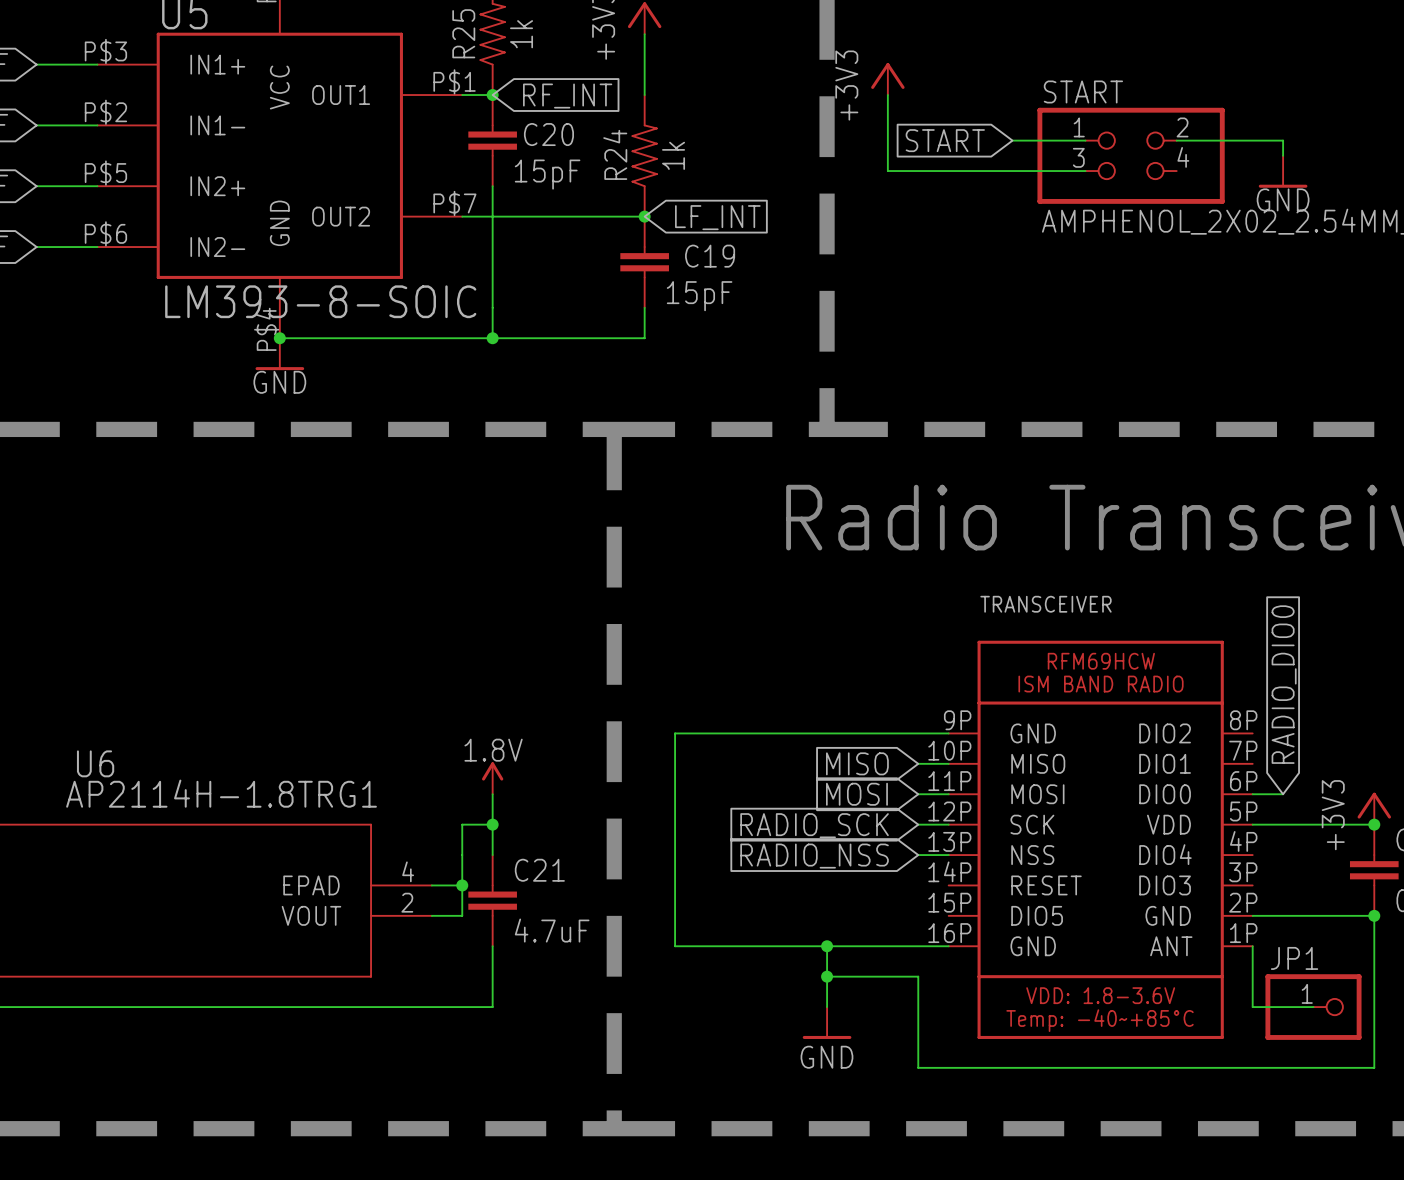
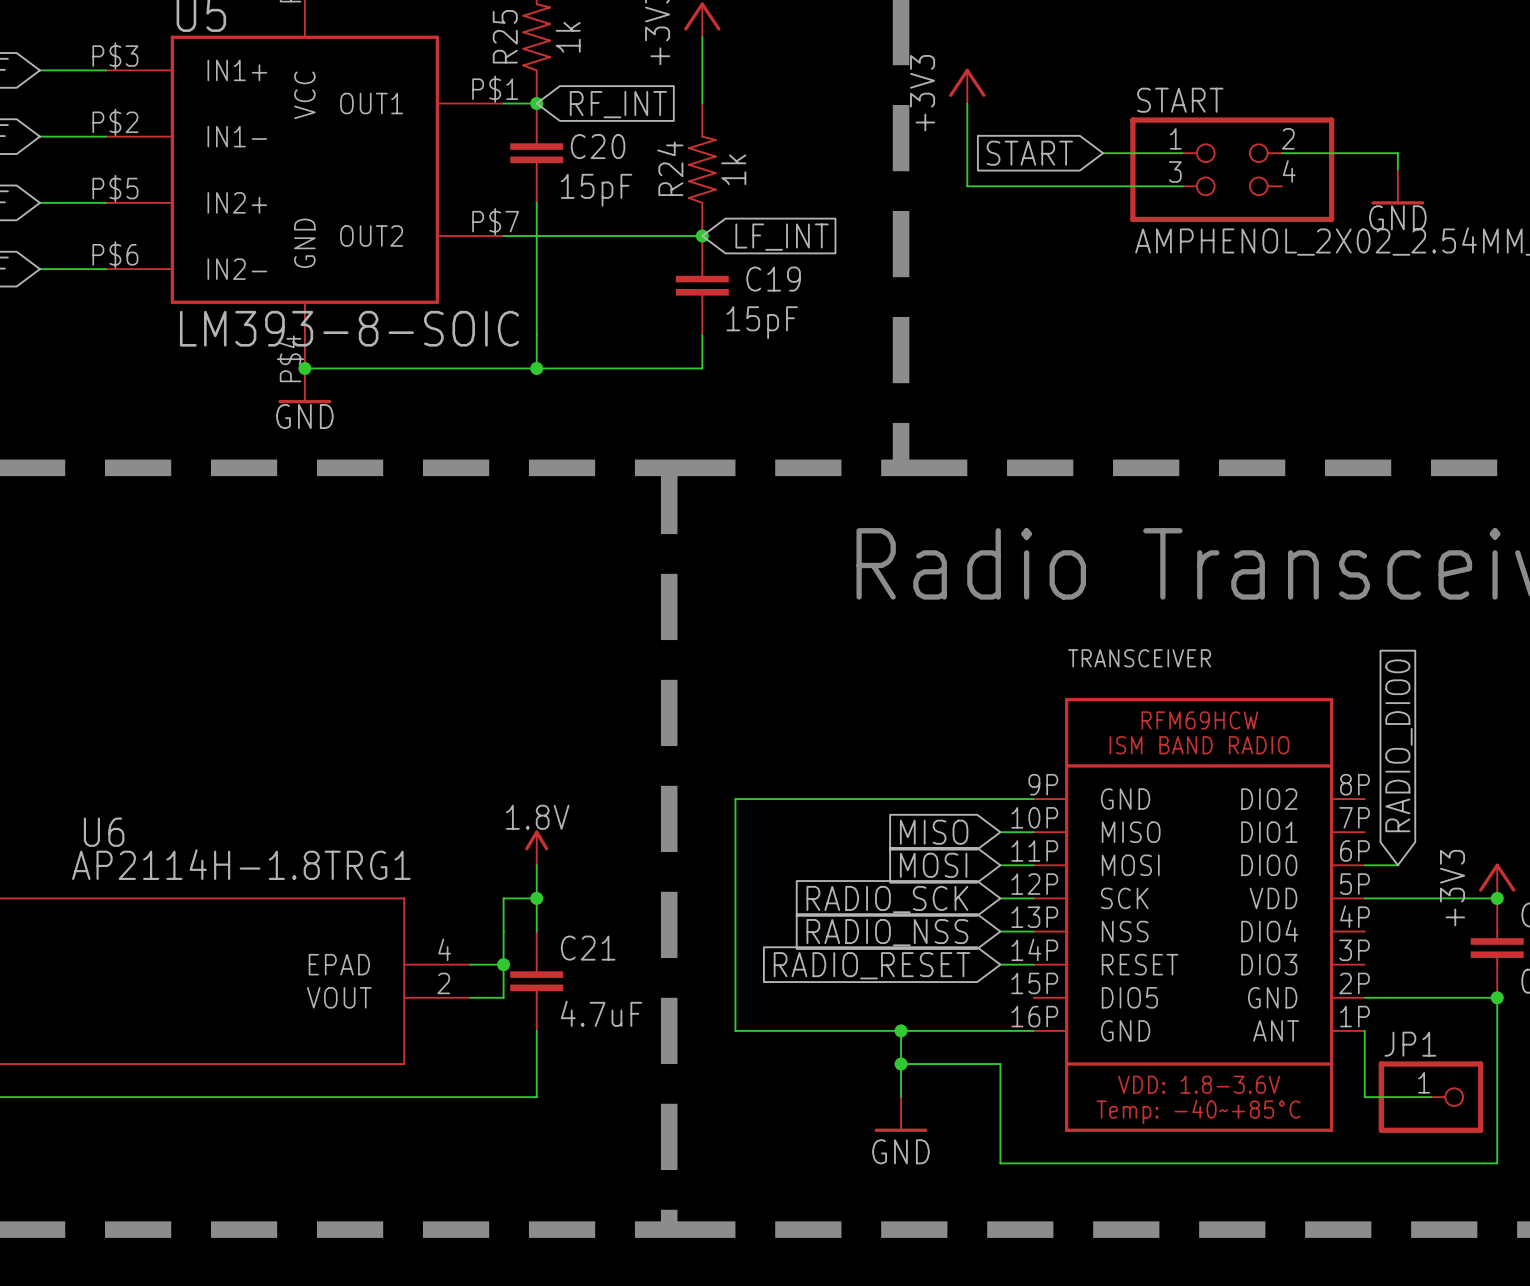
wire: none -> (1000, 964) (1033, 964)
global label: none -> RADIO_RESET (872, 965)

